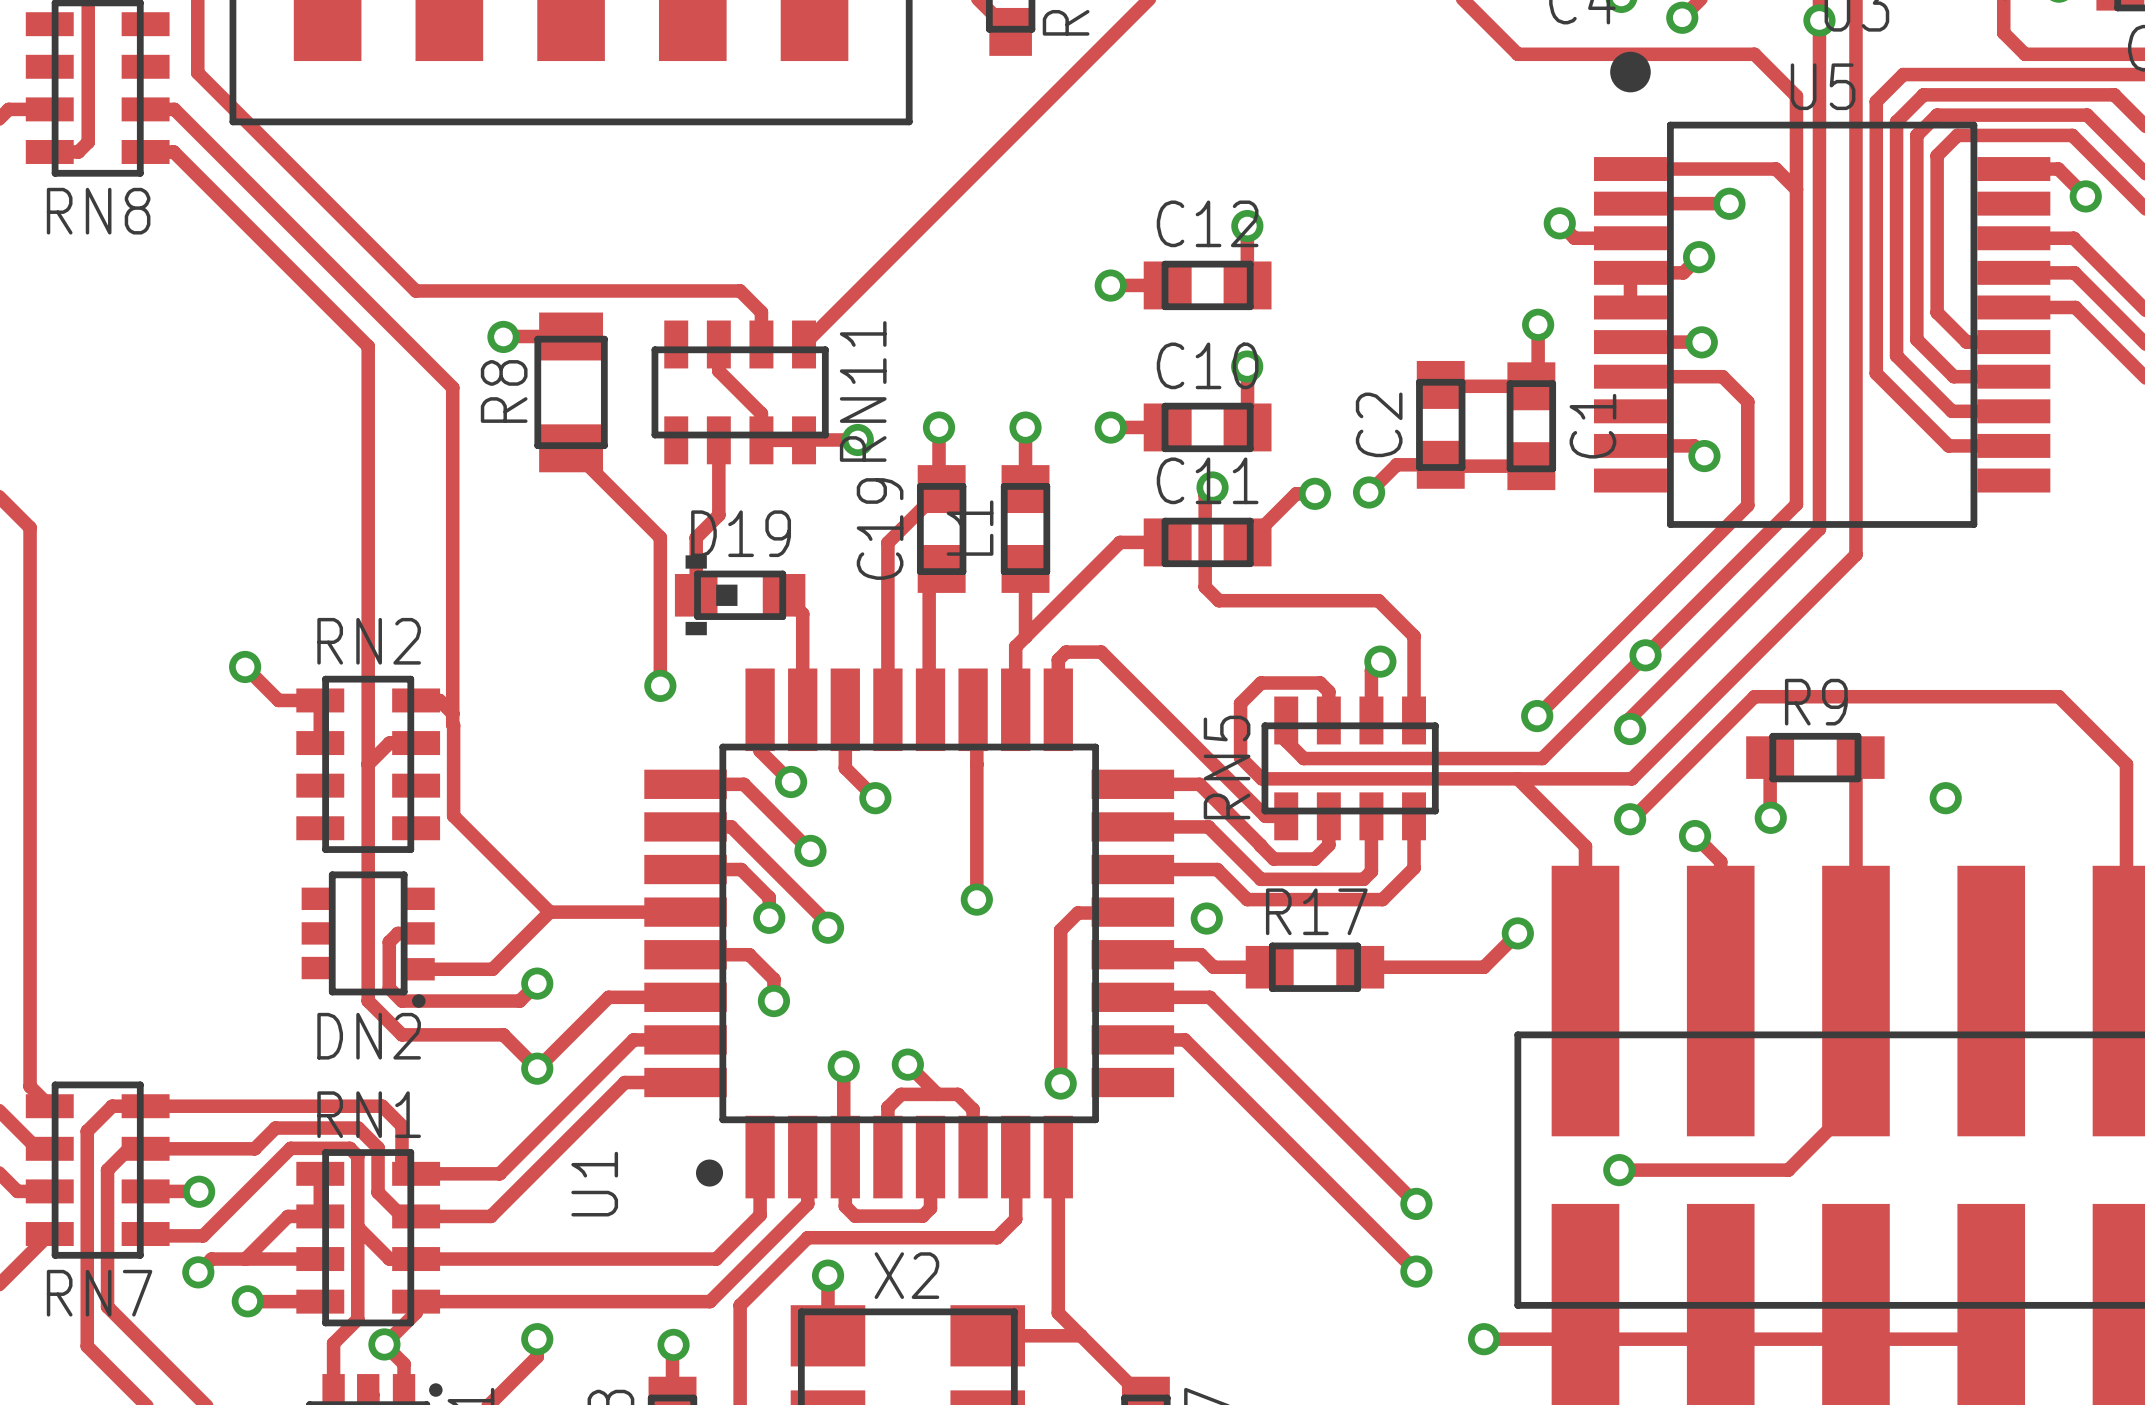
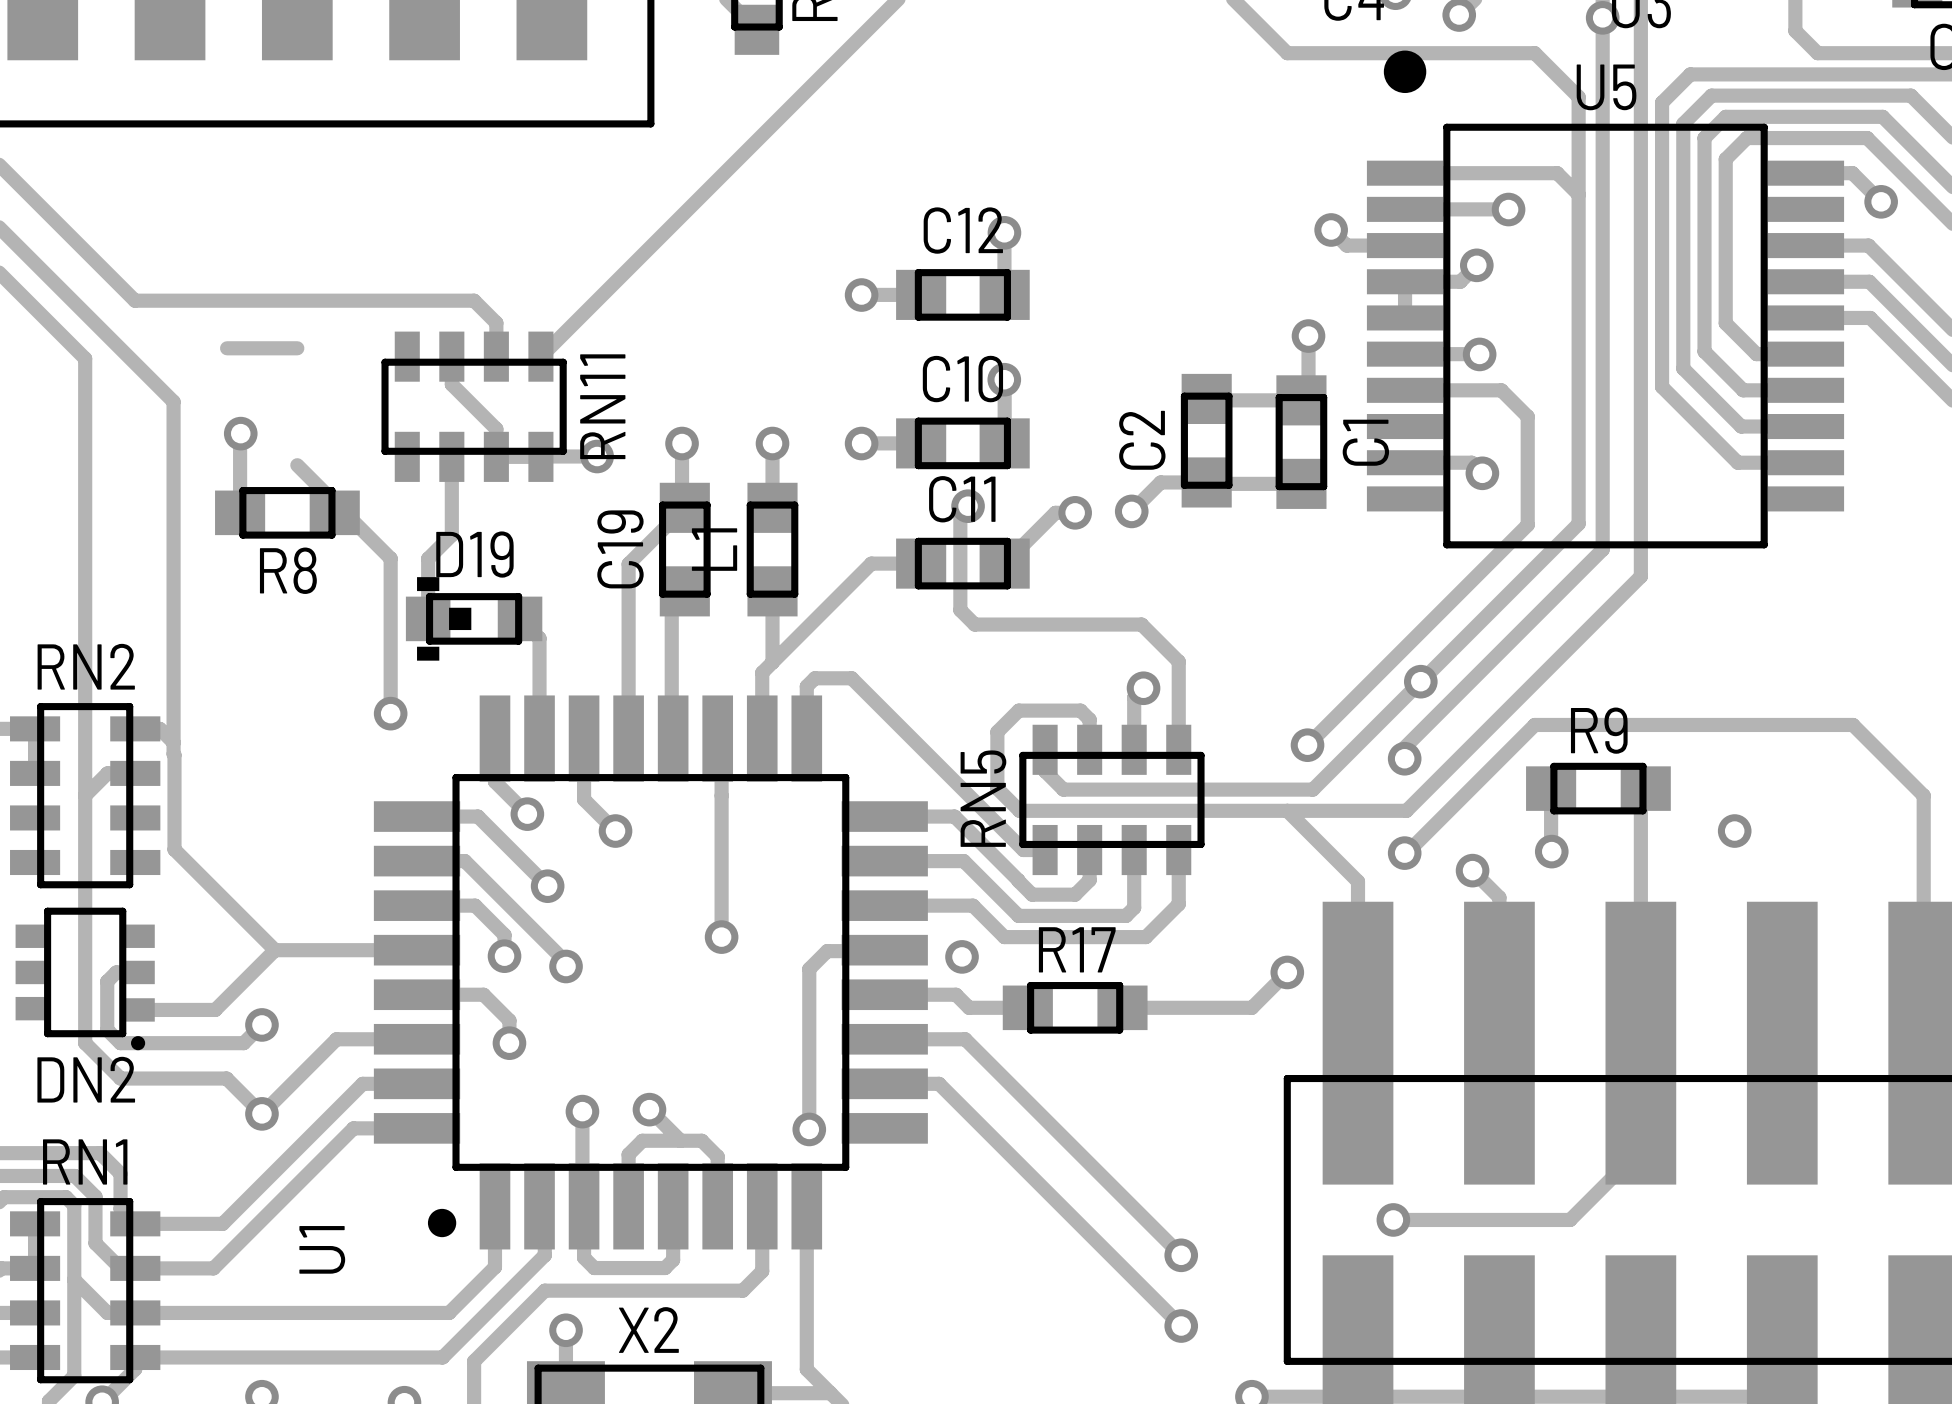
R8 footprint: [534, 312, 608, 473] -> [215, 487, 360, 539]
via position: (503, 336) -> (240, 433)
track: none -> (240, 434) (240, 512)

